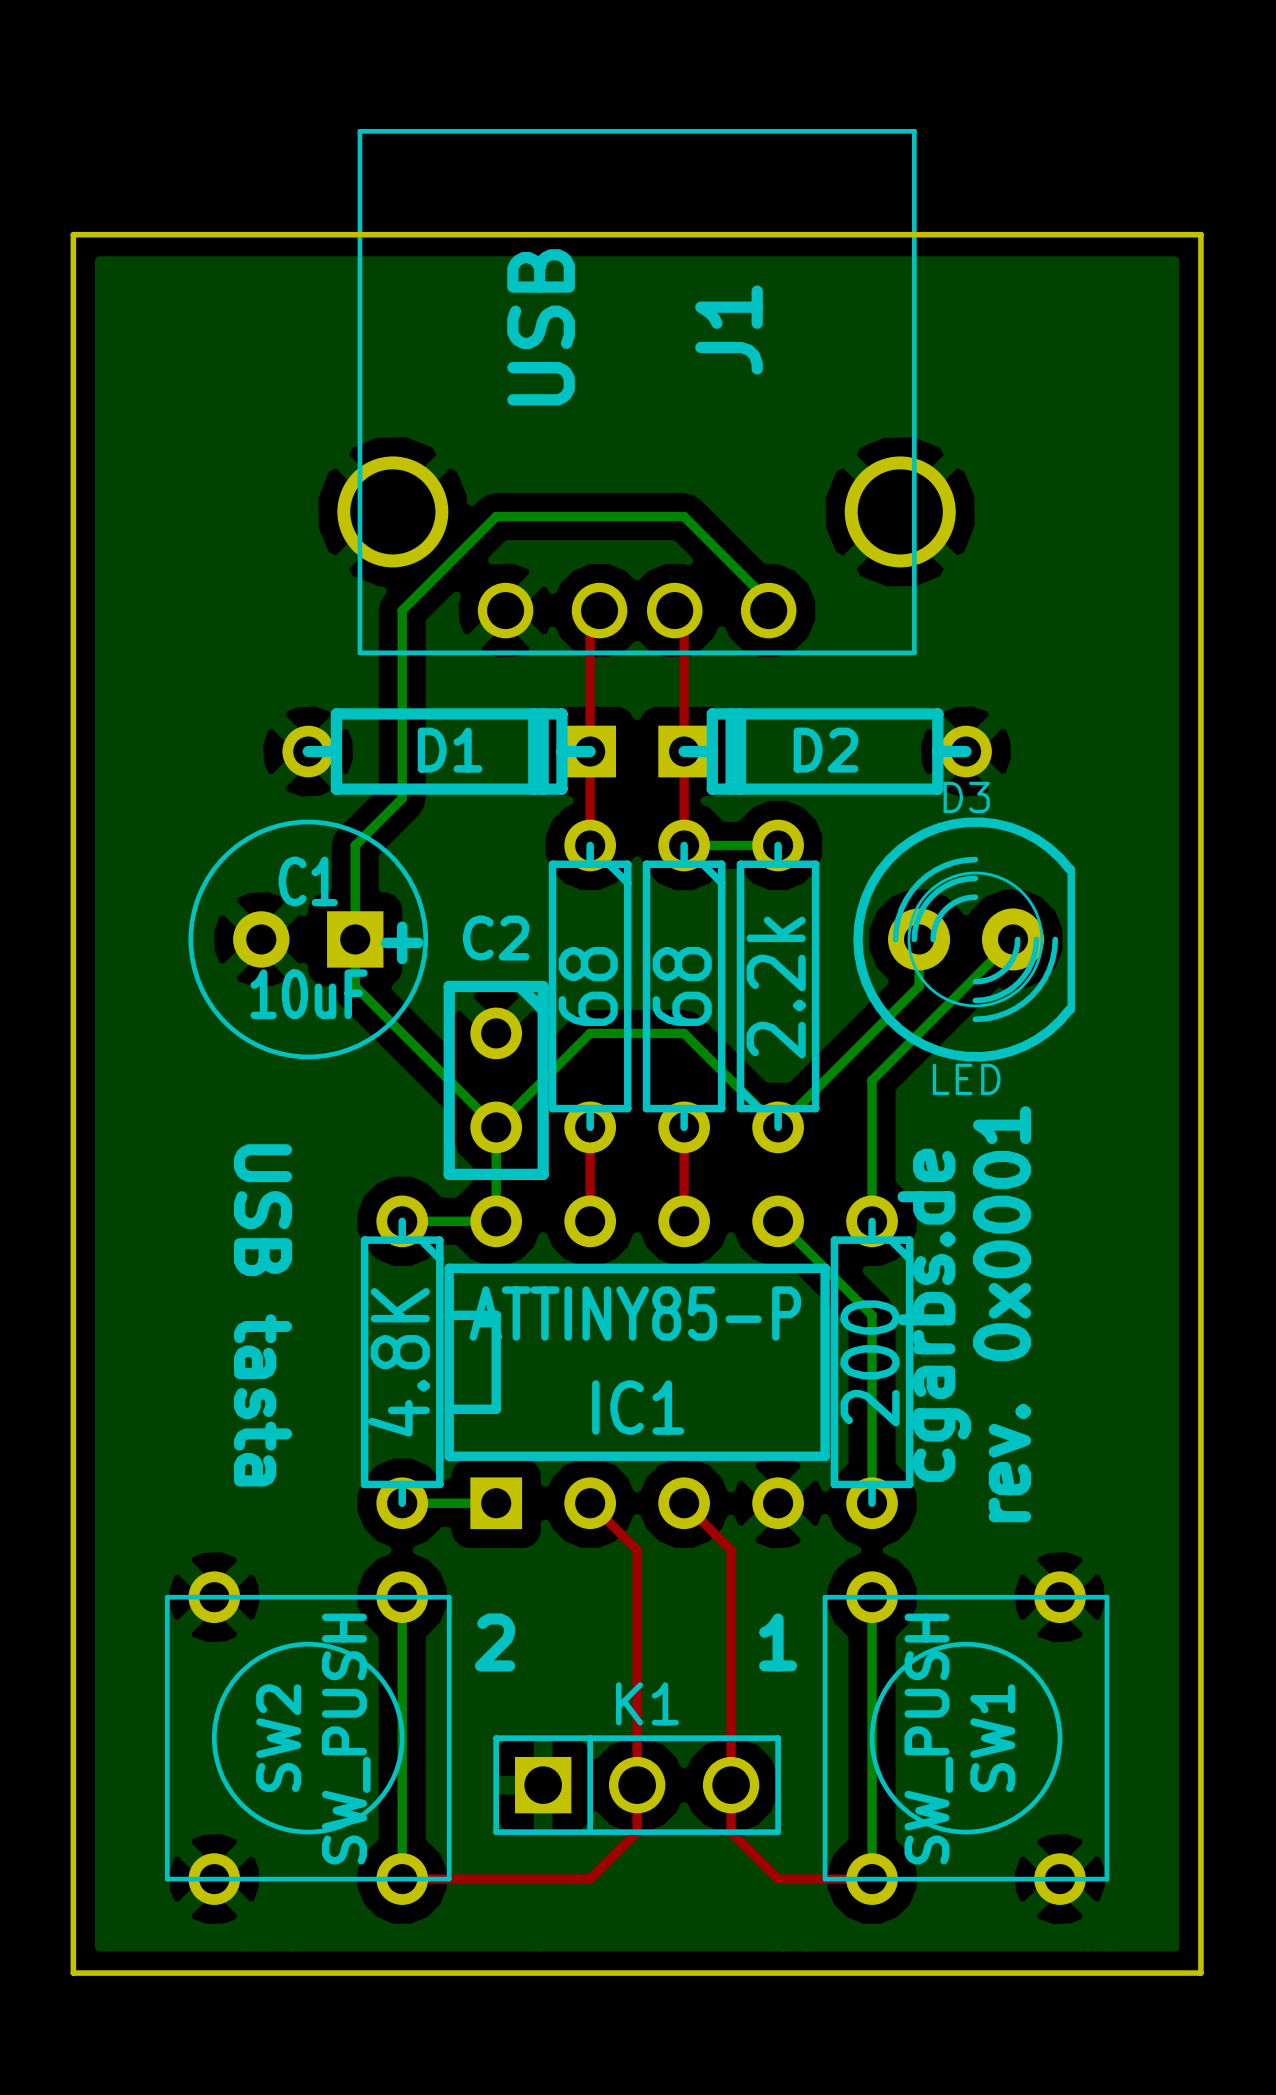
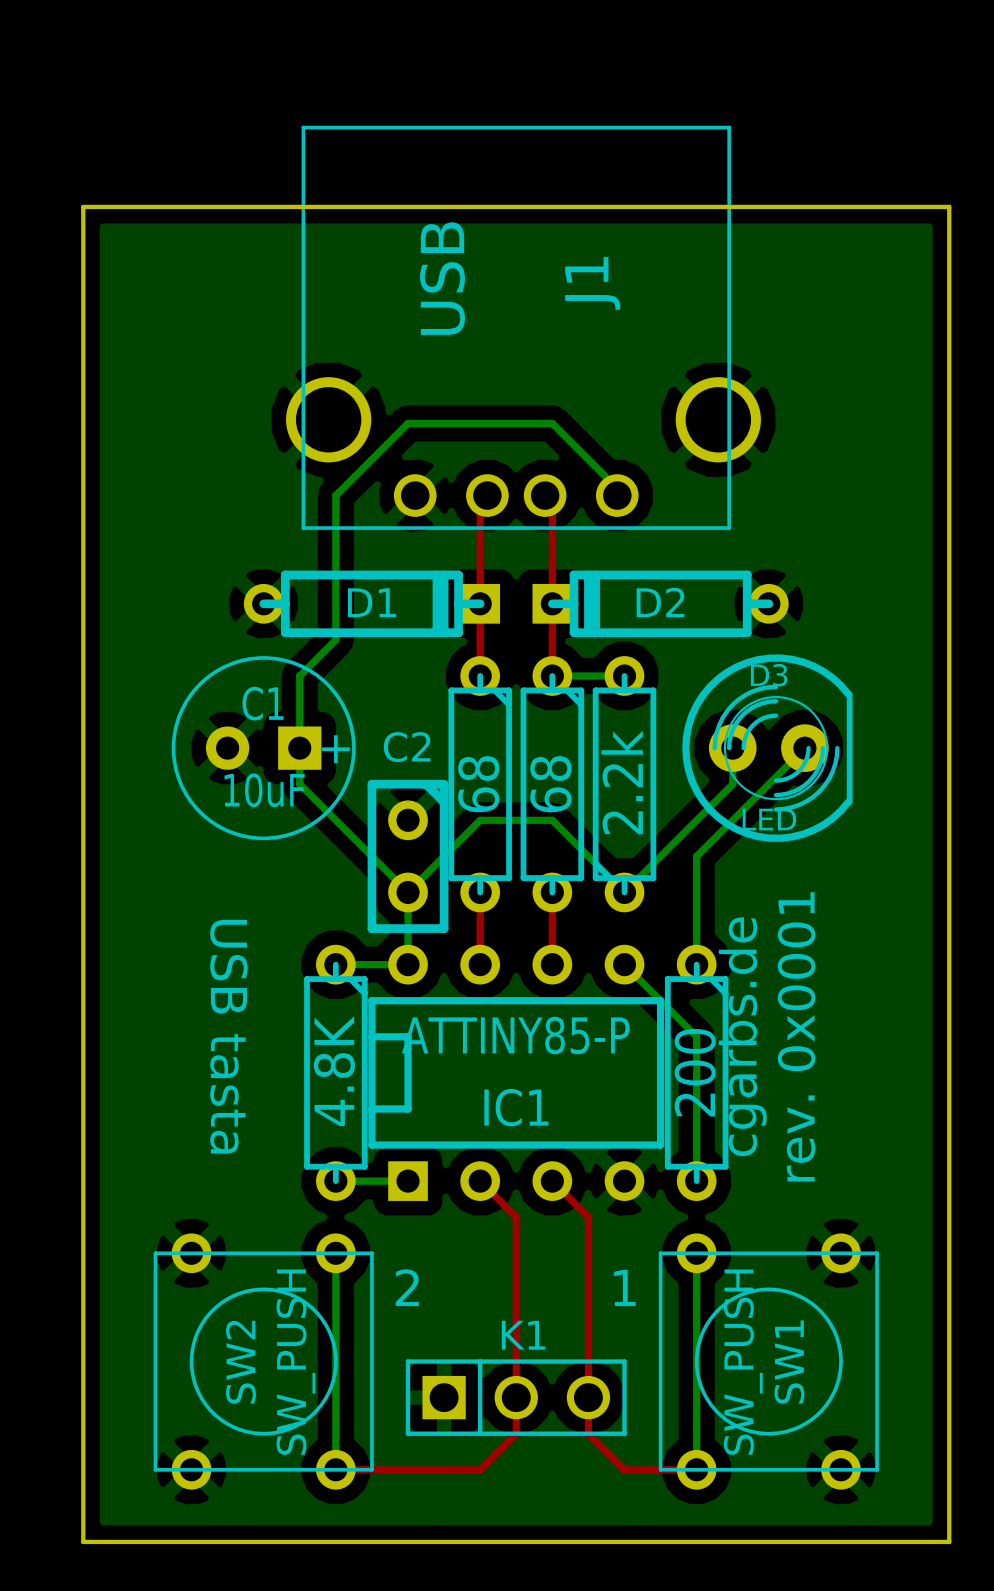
D3 name position: D3 (966, 797) -> D3 (769, 675)
D3 value position: LED (966, 1079) -> LED (769, 819)

